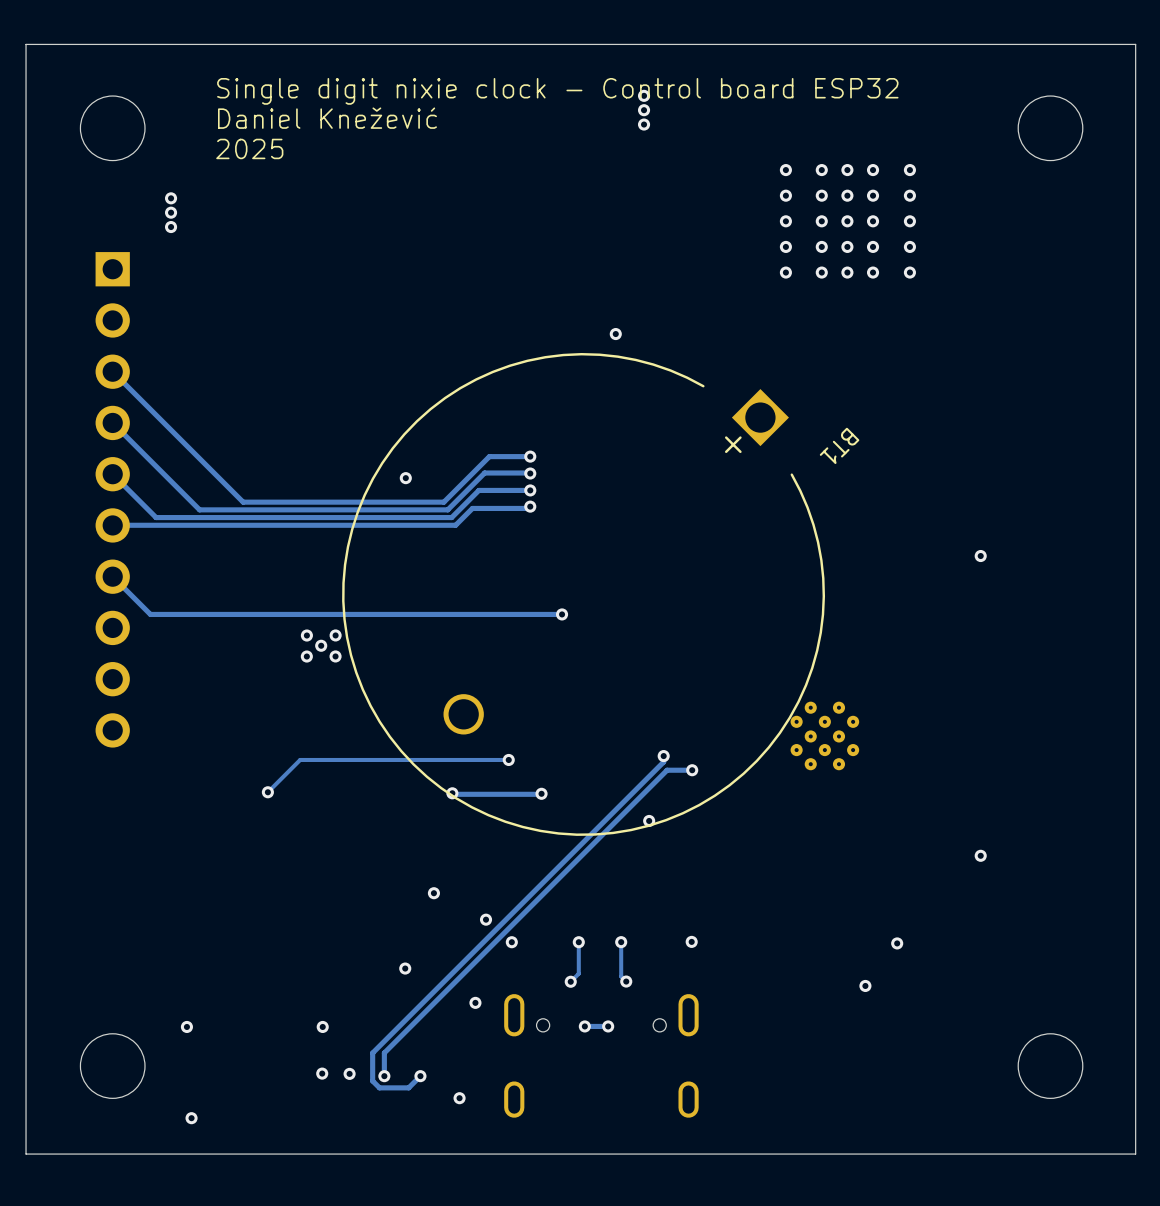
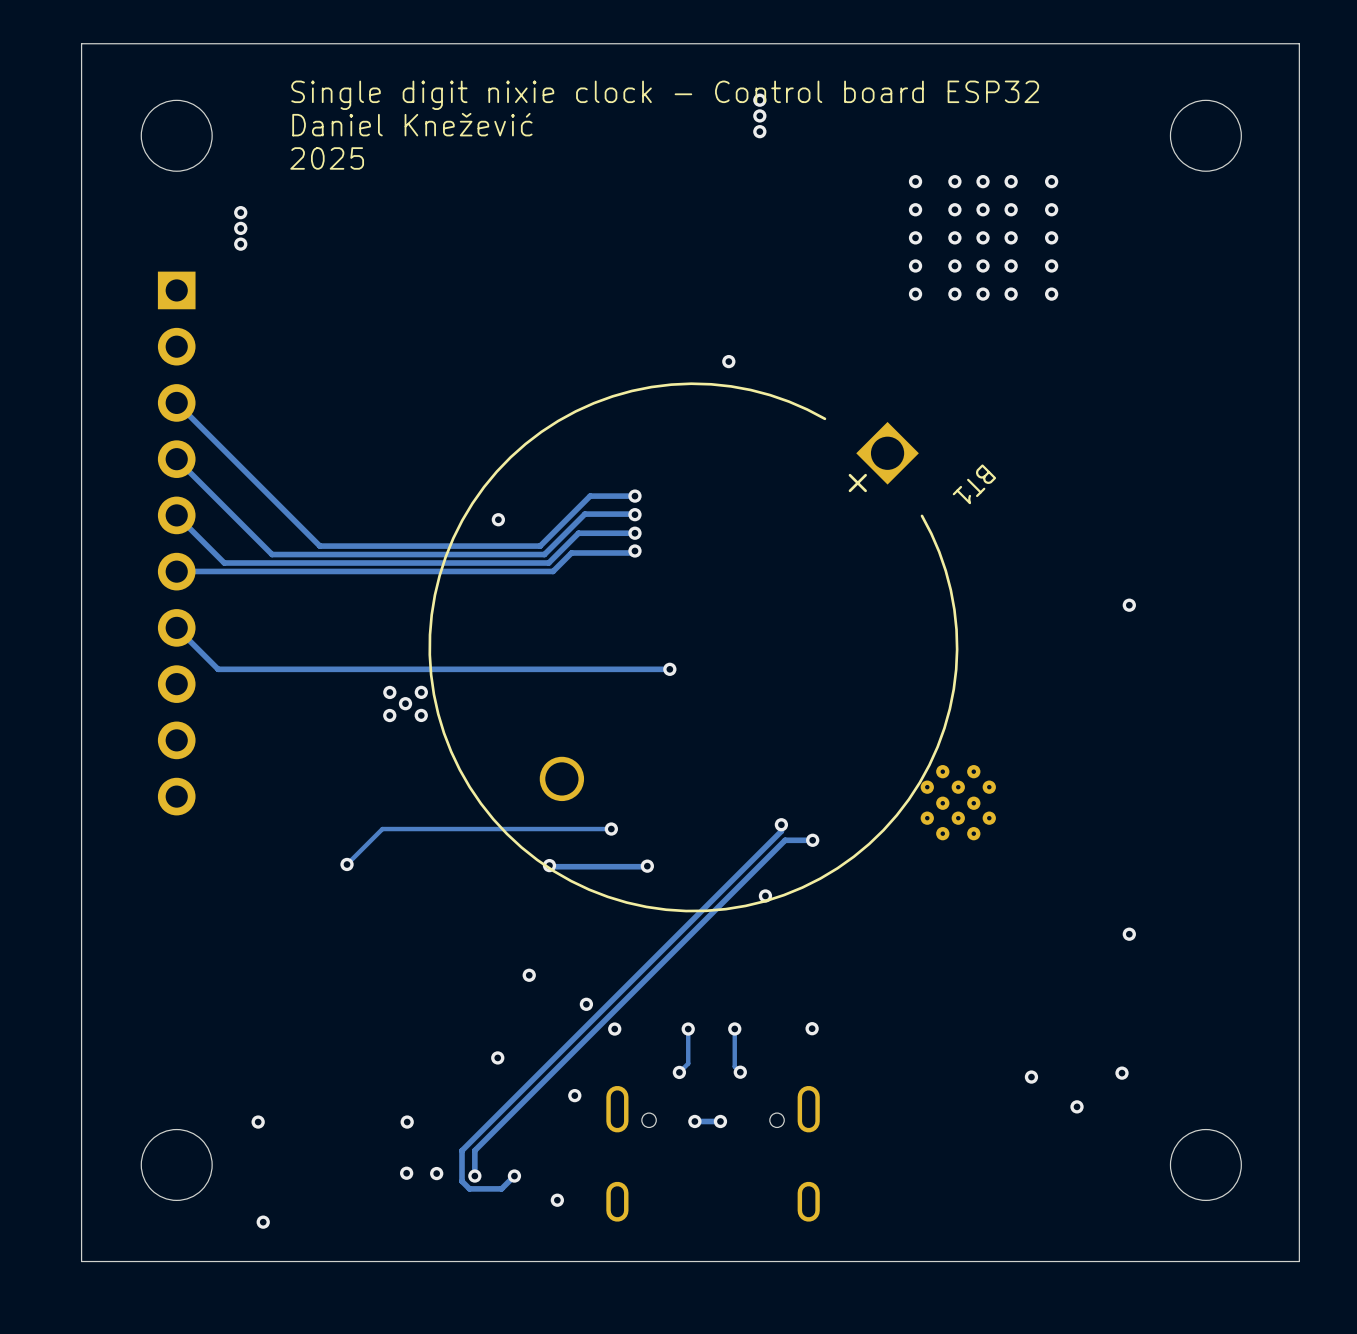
via: (897, 943) -> none
via: none -> (1122, 1073)
via: (865, 985) -> none
via: none -> (1031, 1077)
via: none -> (1077, 1106)

